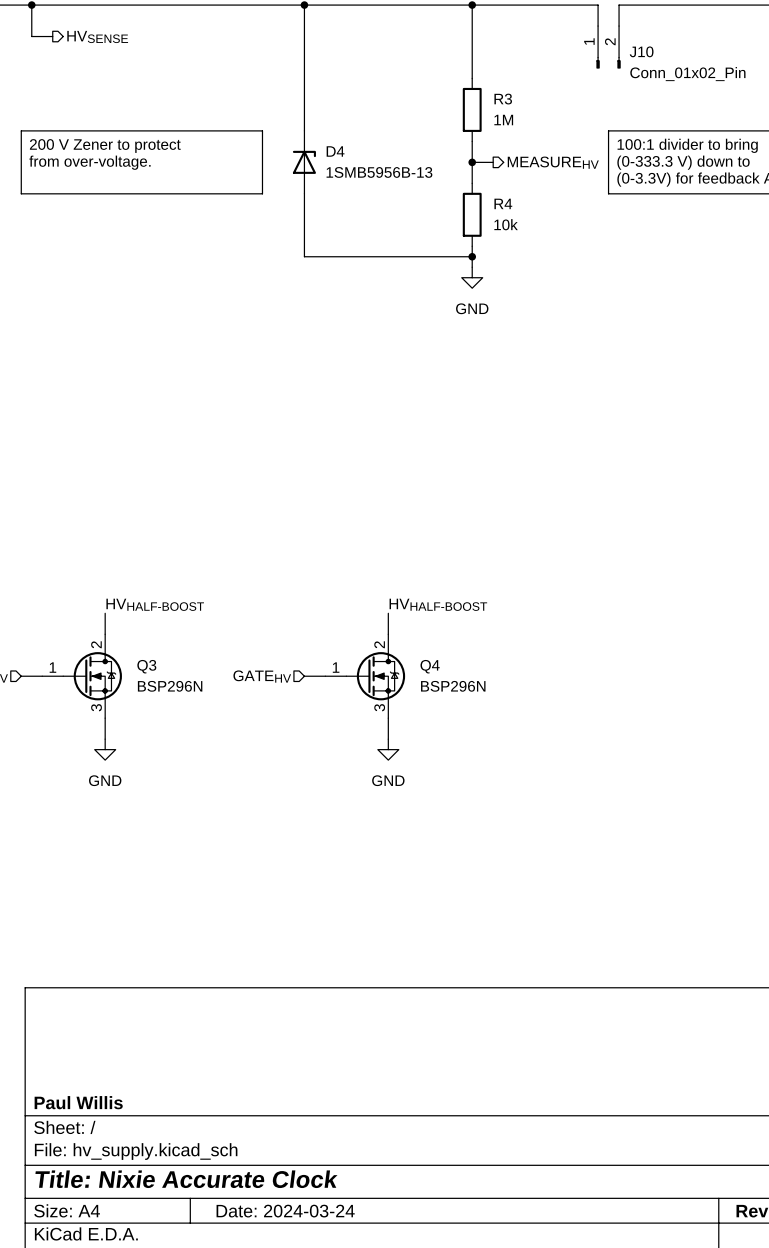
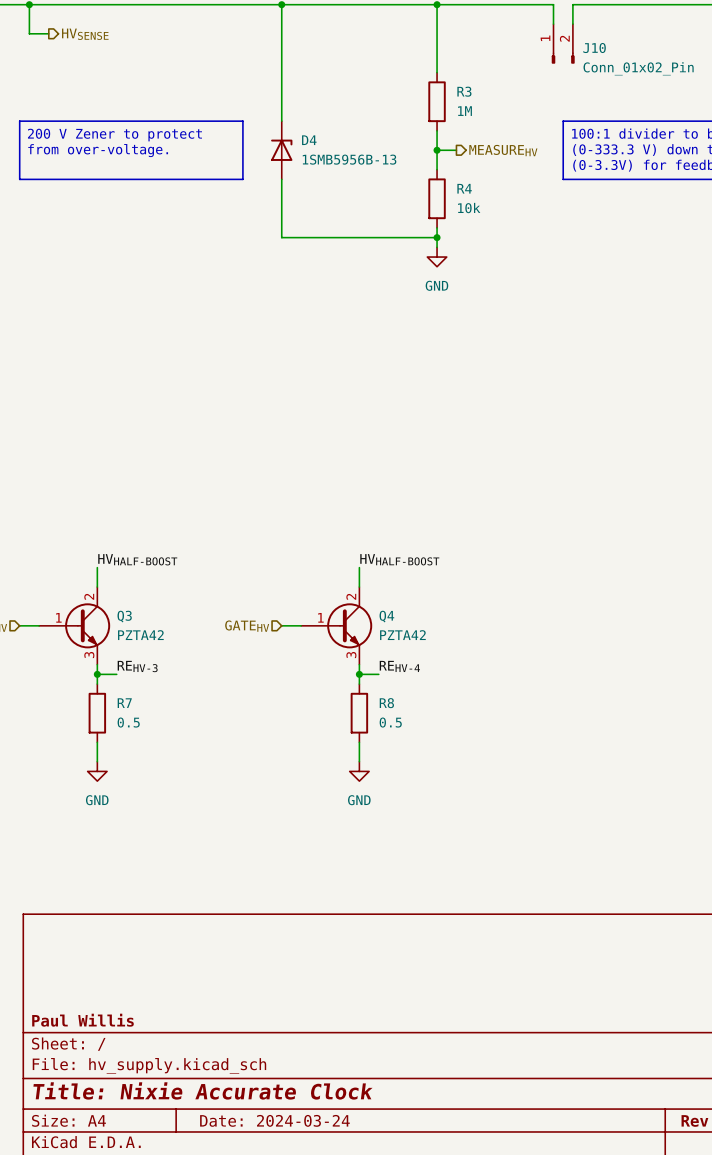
Q3 symbol: [42, 634, 122, 719] -> [39, 587, 111, 665]
Q4 symbol: [325, 634, 406, 719] -> [301, 587, 373, 665]
Q3 value: BSP296N (170, 686) -> PZTA42 (140, 635)
Q4 value: BSP296N (453, 686) -> PZTA42 (402, 635)
label: none -> REHV-3 (137, 666)
label: none -> REHV-4 (399, 666)
wire: none -> (97, 674) (116, 674)
junction: none -> (97, 674)
wire: none -> (359, 674) (378, 674)
junction: none -> (359, 674)
power symbol position: GND (105, 749) -> GND (97, 771)
power symbol position: GND (388, 749) -> GND (359, 771)
R7: none -> 0.5 (97, 713)
R8: none -> 0.5 (359, 713)
wire: none -> (97, 742) (97, 761)
wire: none -> (359, 742) (359, 761)

